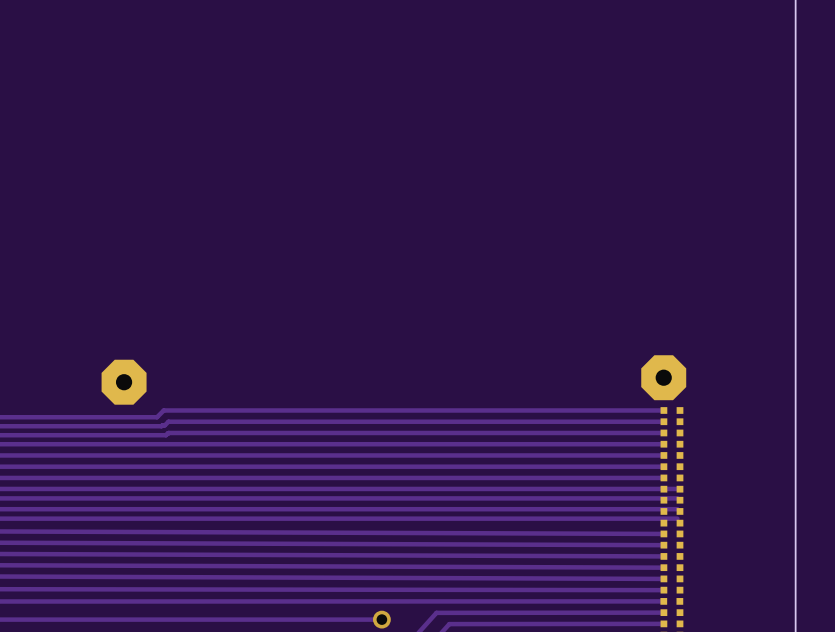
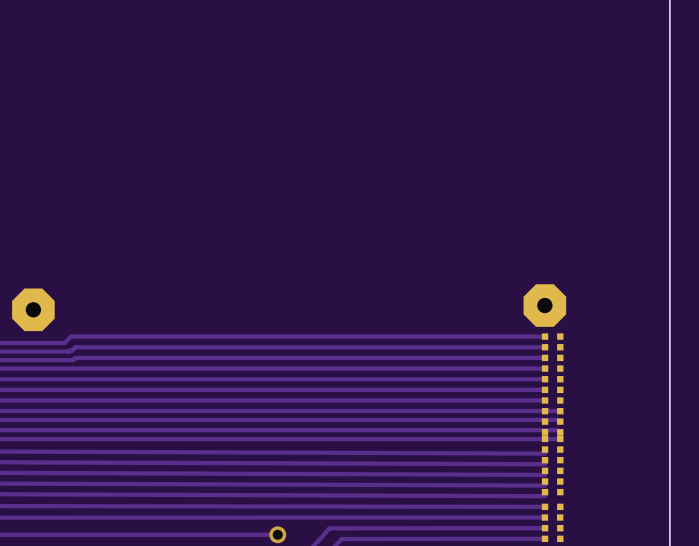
part: none -> (552, 438)
part: (671, 523) -> none
part: none -> (552, 449)
part: (671, 533) -> none
part: none -> (552, 460)
part: (671, 545) -> none
part: none -> (552, 470)
part: (671, 556) -> none
part: none -> (552, 481)
part: (671, 567) -> none
part: none -> (552, 492)
part: (671, 578) -> none

